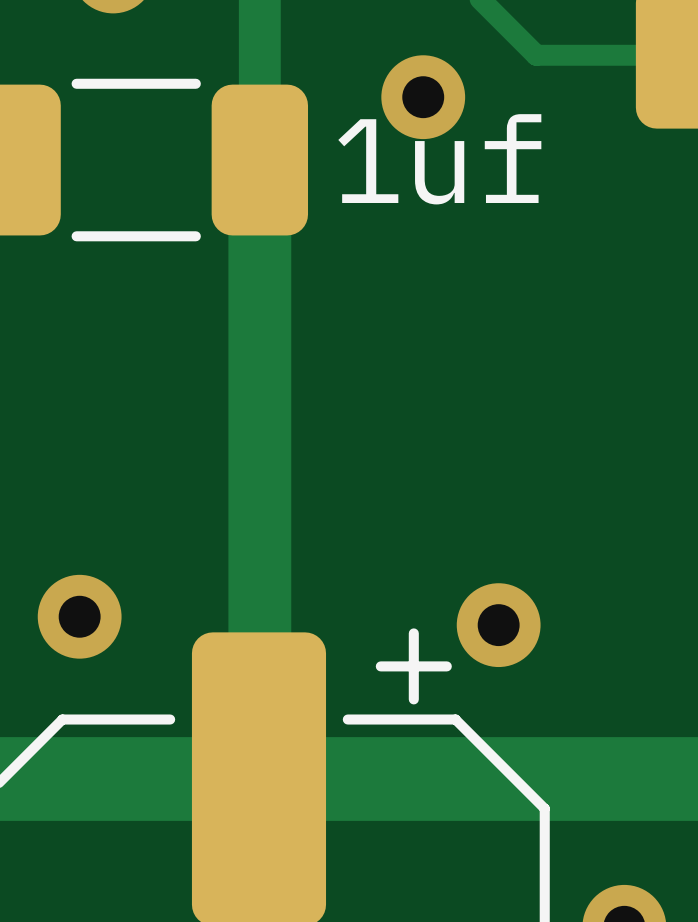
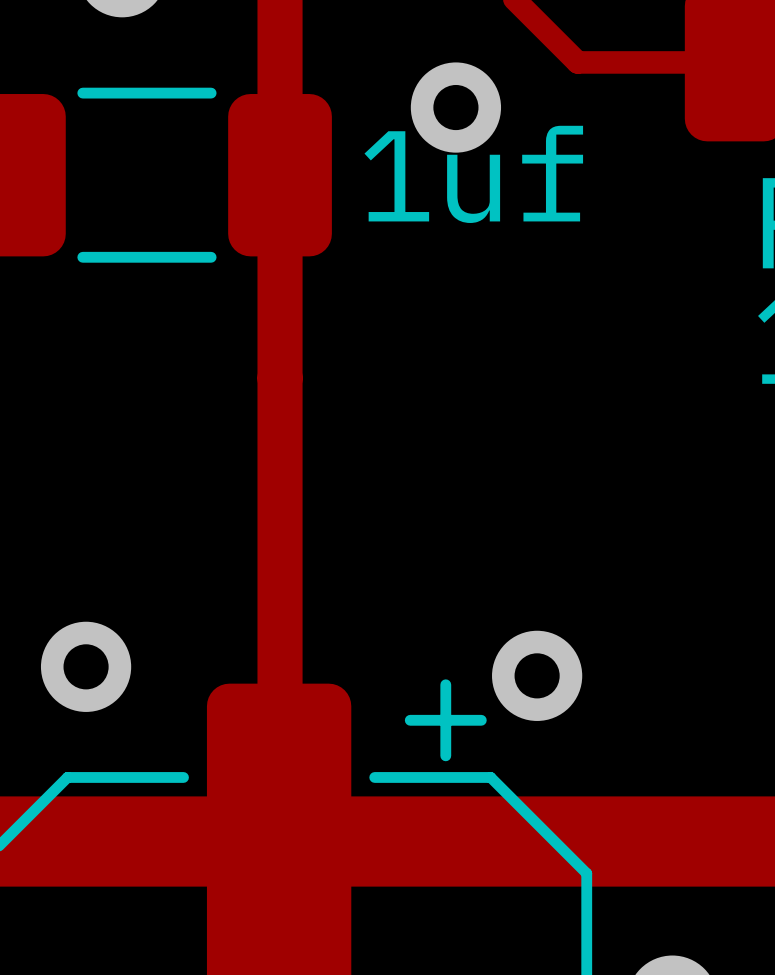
track width: thick (259, 160) (259, 778) -> thin (280, 175) (280, 840)

